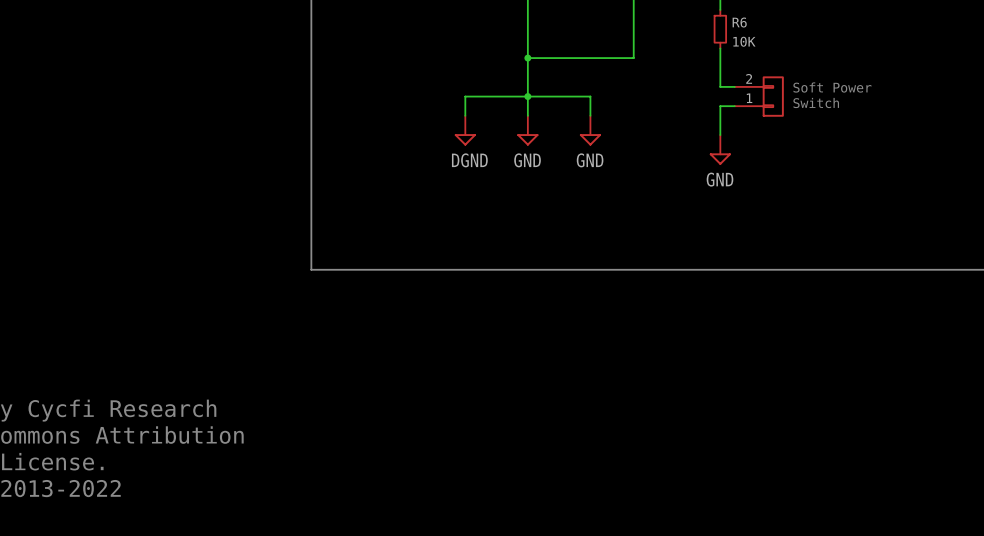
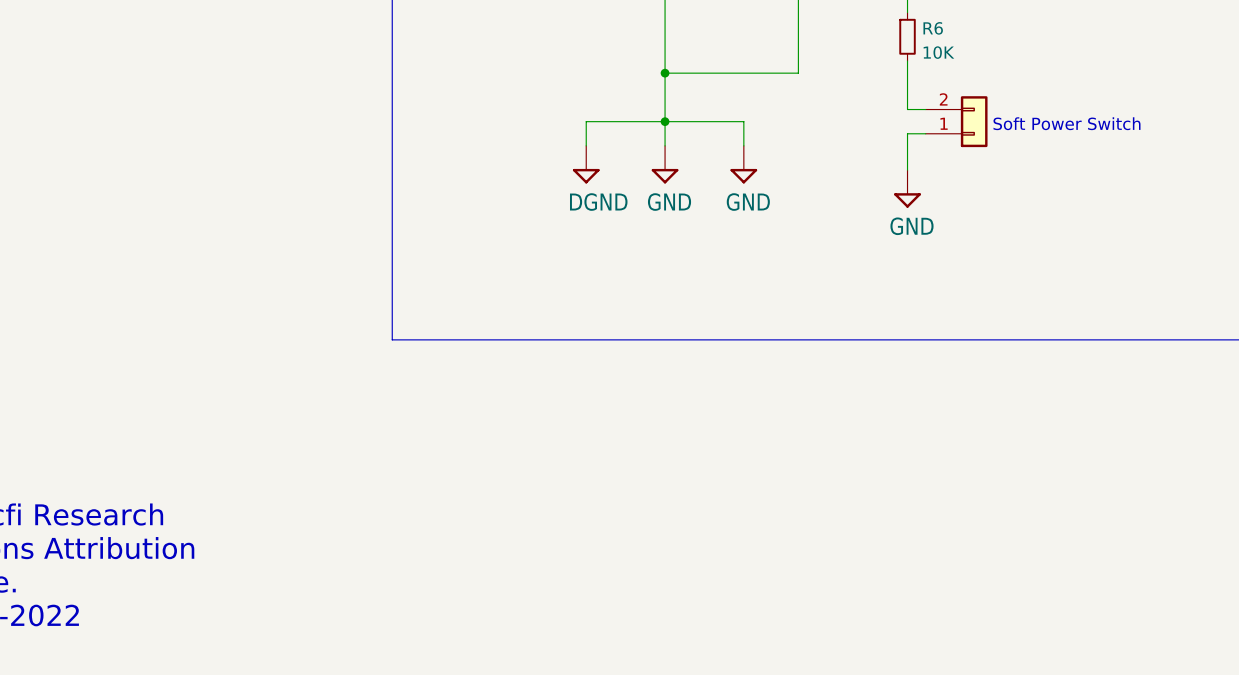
text: Soft Power (832, 87) -> Soft Power Switch (1066, 123)
text: Switch (816, 103) -> none

